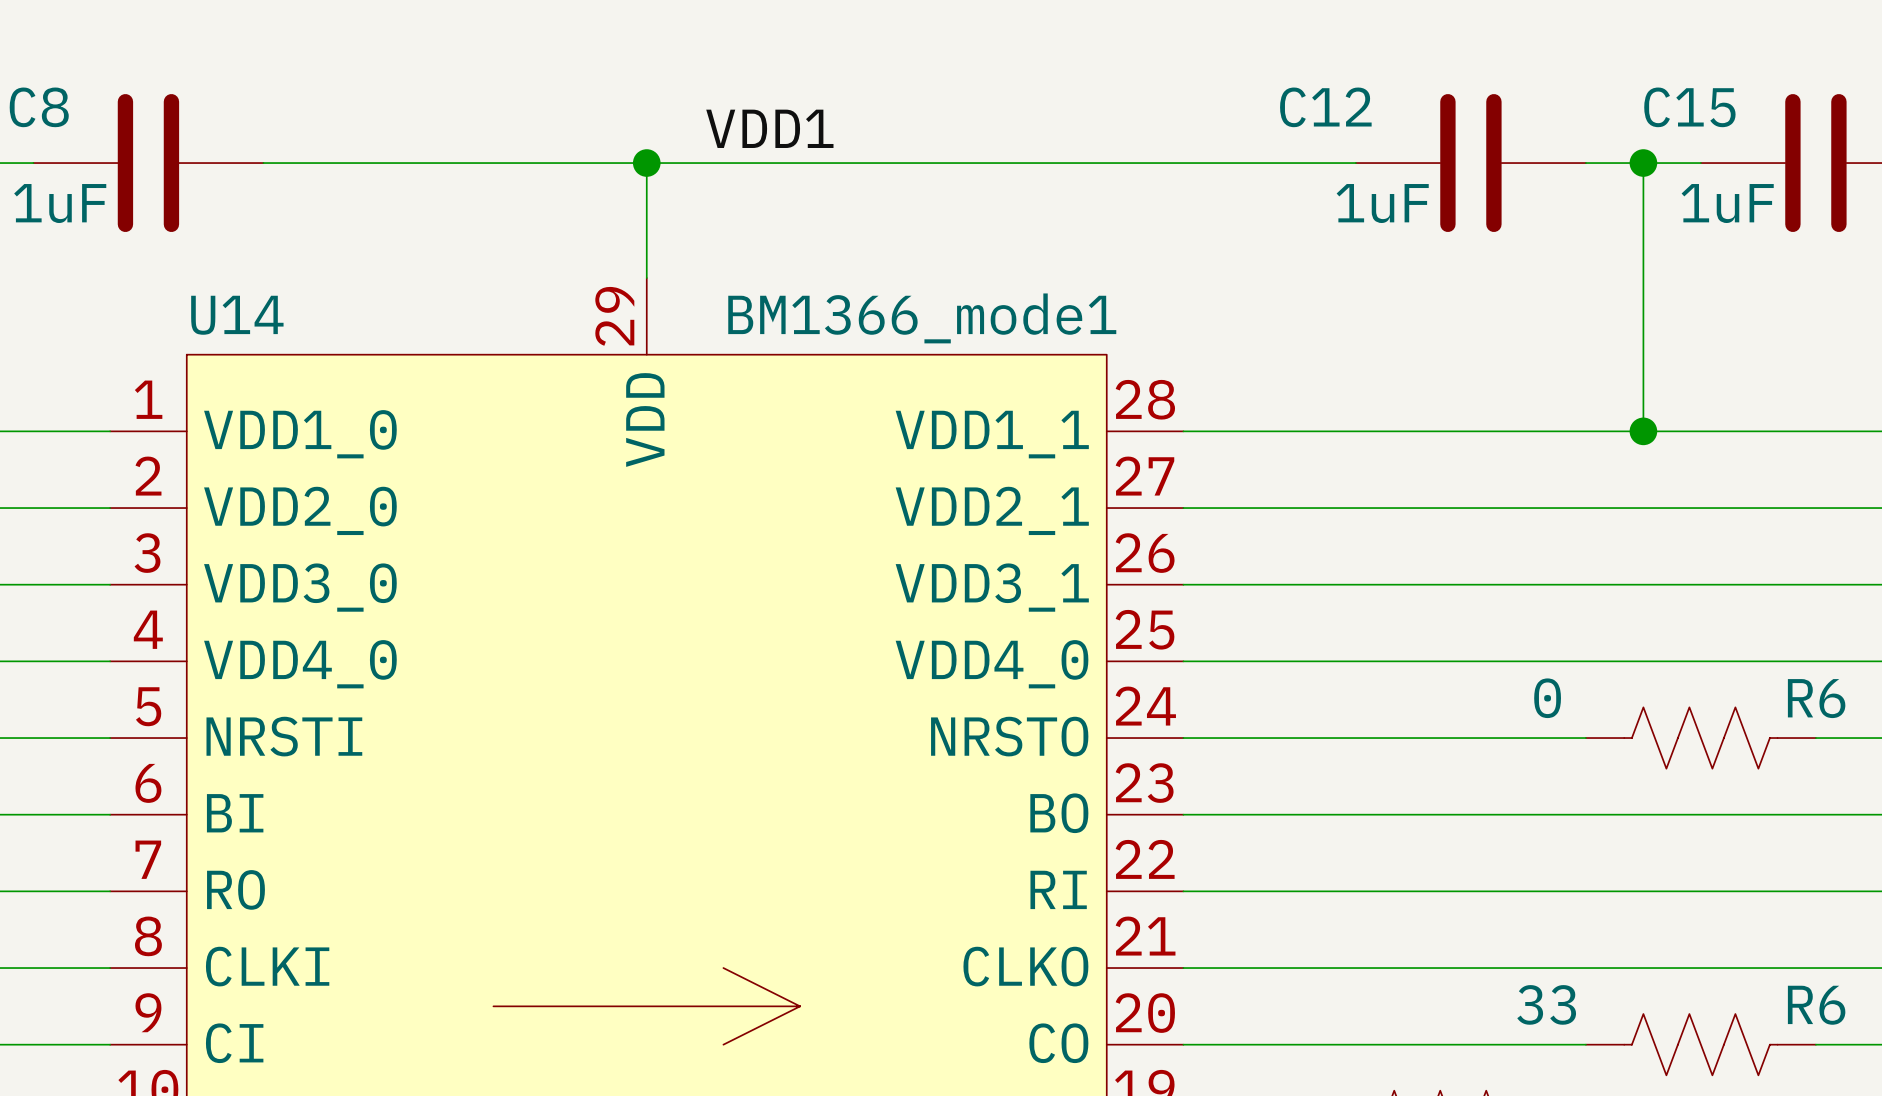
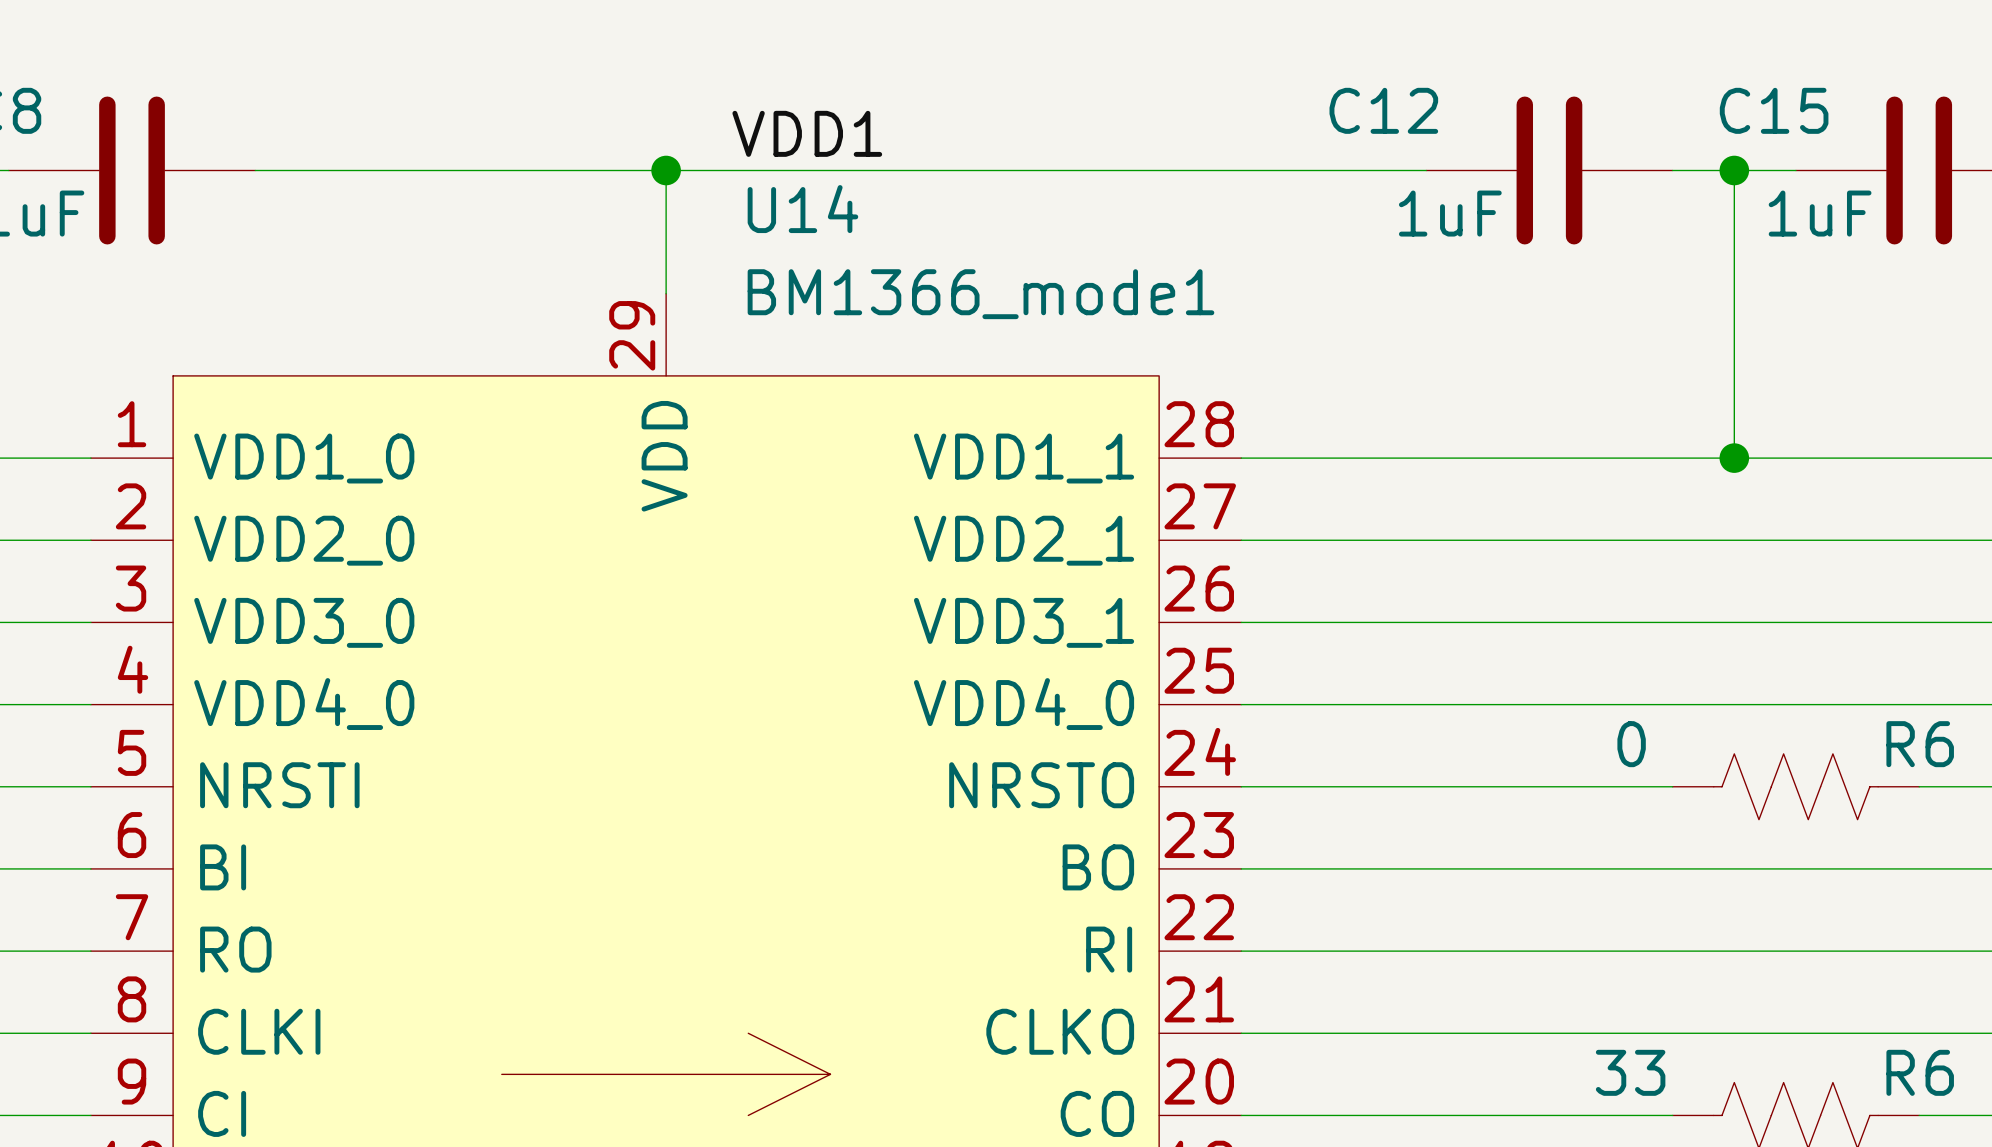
U14 name position: U14 (237, 315) -> U14 (802, 209)
U14 value position: BM1366_mode1 (922, 318) -> BM1366_mode1 (980, 294)

